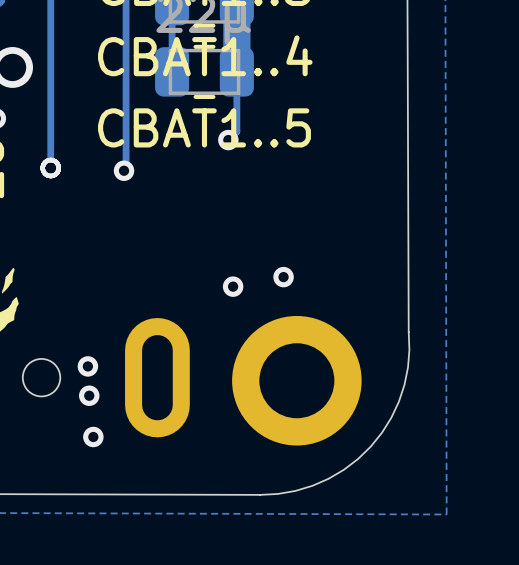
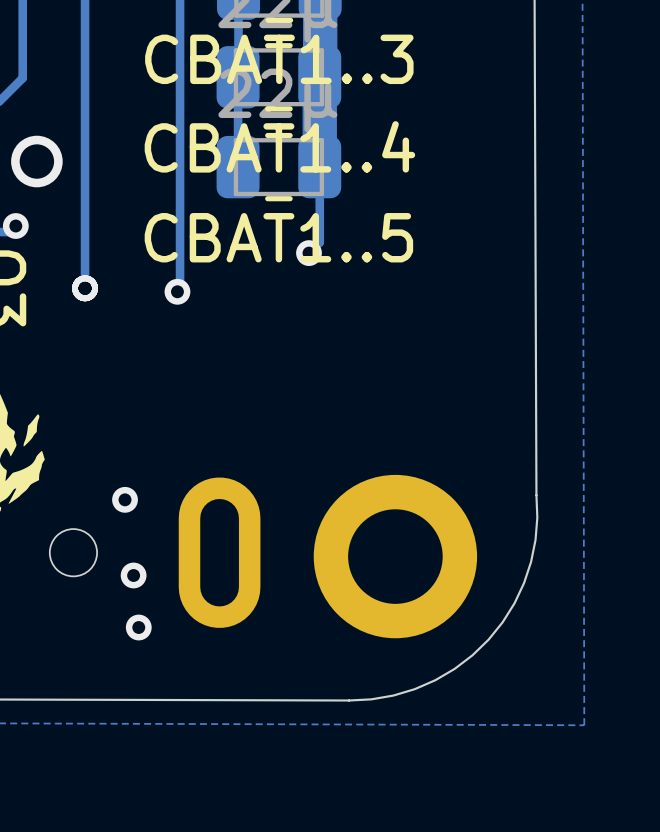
via: (283, 277) -> none
via: (233, 286) -> none
via position: (87, 366) -> (125, 499)

